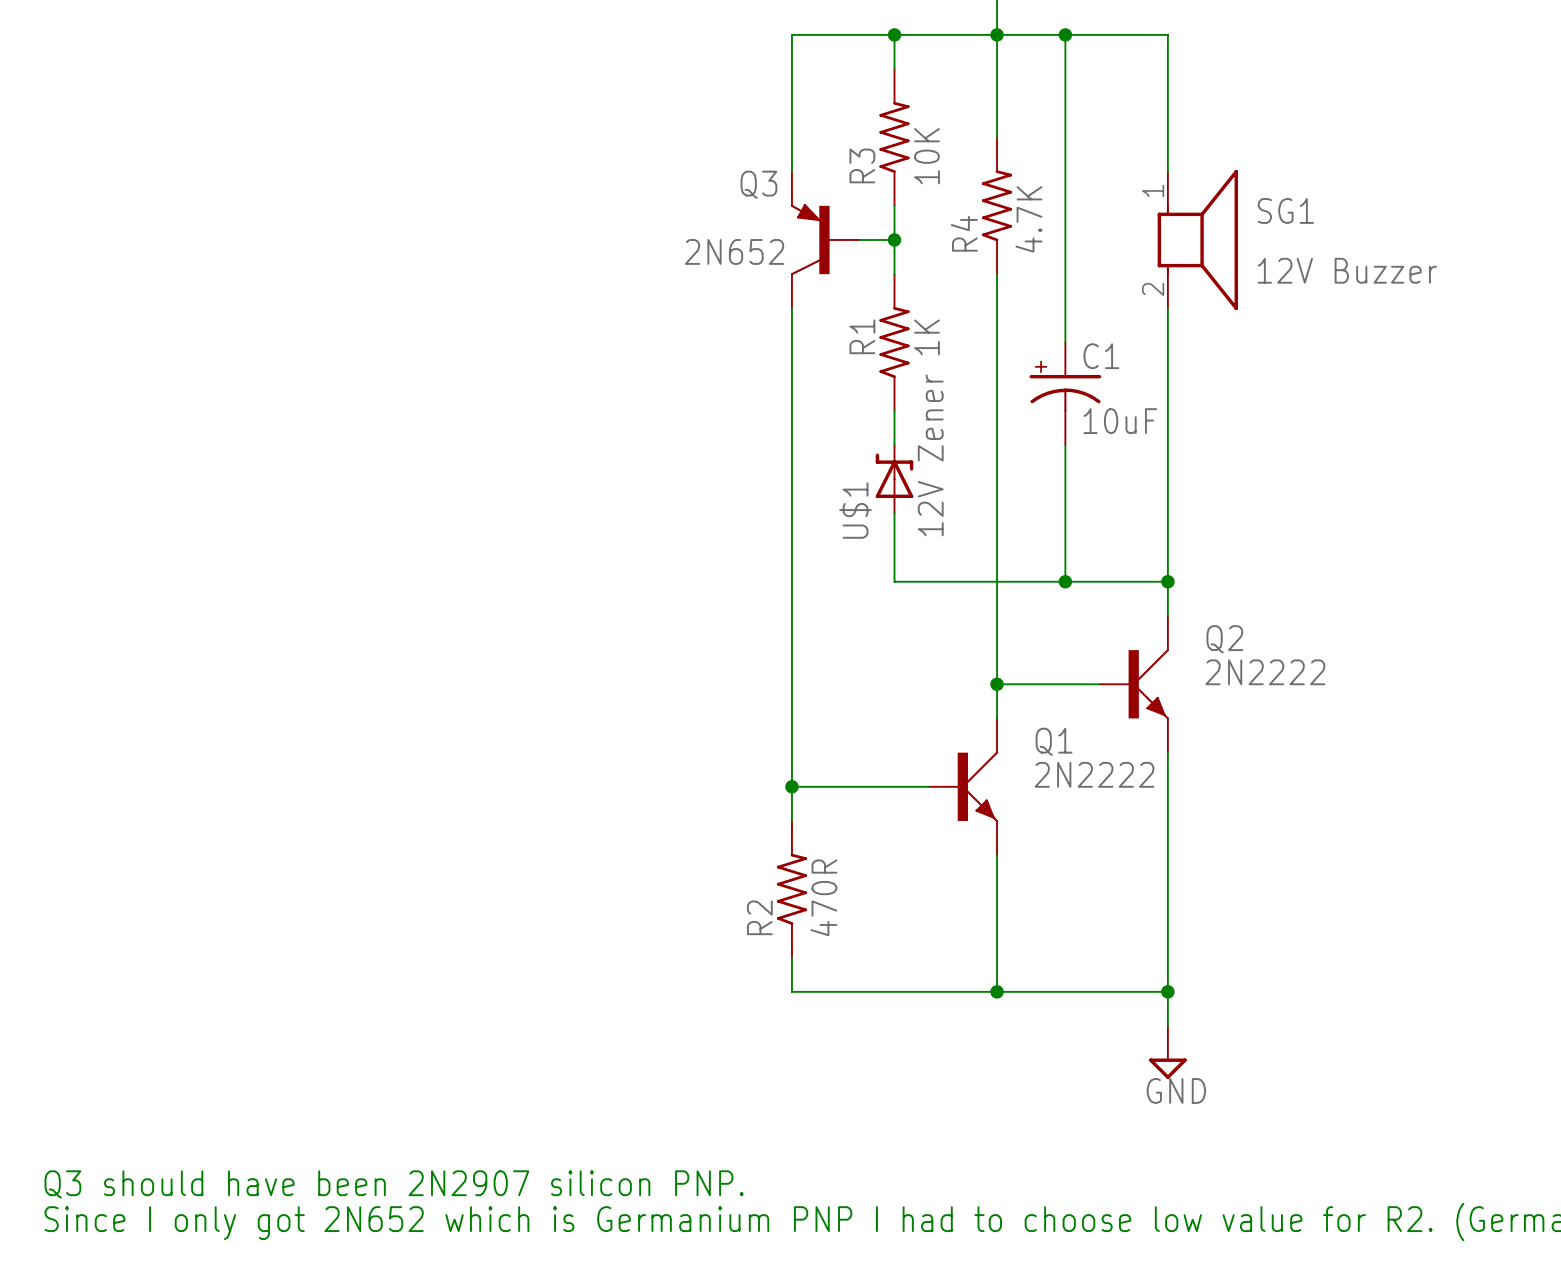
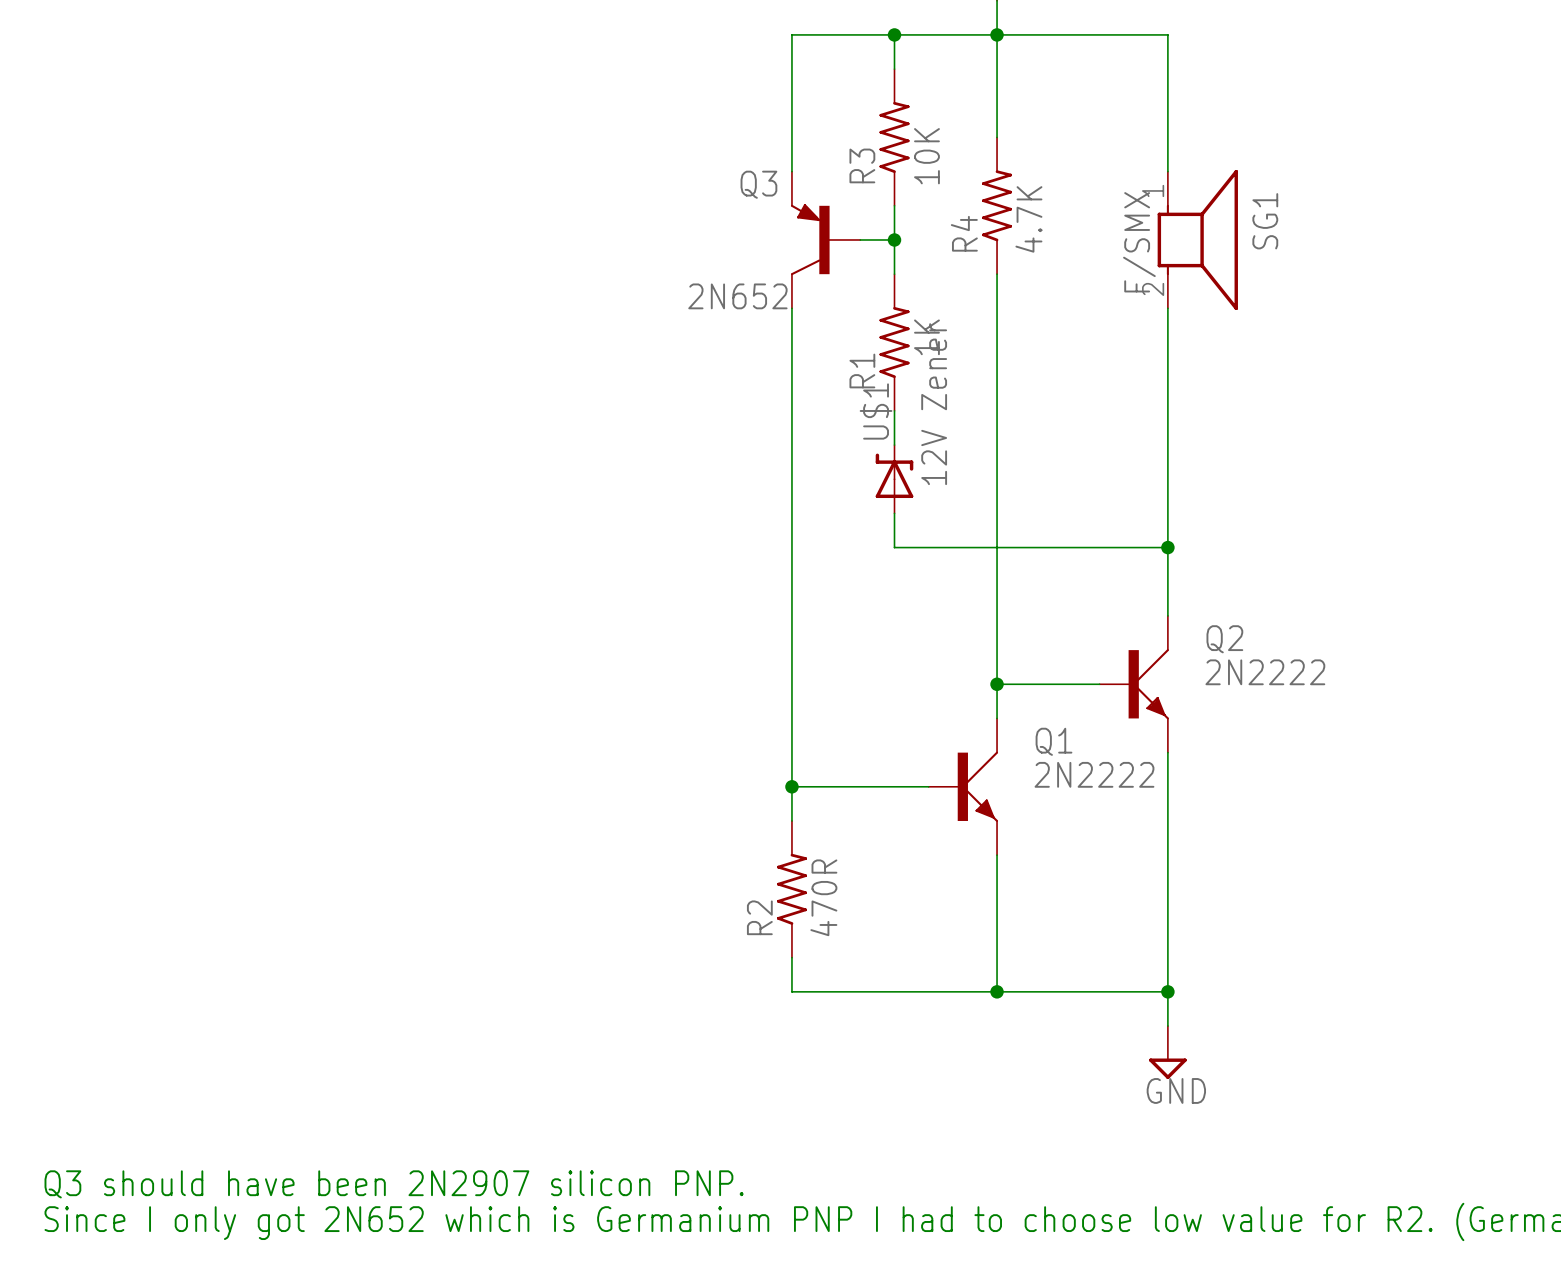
wire: (1065, 34) (1065, 342) -> none
junction: (1065, 34) -> none
SG1 name rotation: 0° (1285, 210) -> 90° counterclockwise (1265, 221)
Q3 value position: 2N652 (734, 251) -> 2N652 (737, 296)
SG1 value: 12V Buzzer (1347, 270) -> F/SMX (1139, 242)
R1 name position: R1 (862, 336) -> R1 (862, 370)
C1: 10uF (1065, 393) -> none
wire: (1065, 445) (1065, 581) -> none
U$1 value position: 12V Zener (930, 455) -> 12V Zener (934, 404)
U$1 name position: U$1 (855, 510) -> U$1 (876, 411)
wire: (894, 547) (894, 581) (1167, 581) -> (894, 547) (1167, 547)
junction: (1065, 581) -> none
junction position: (1167, 581) -> (1167, 547)

